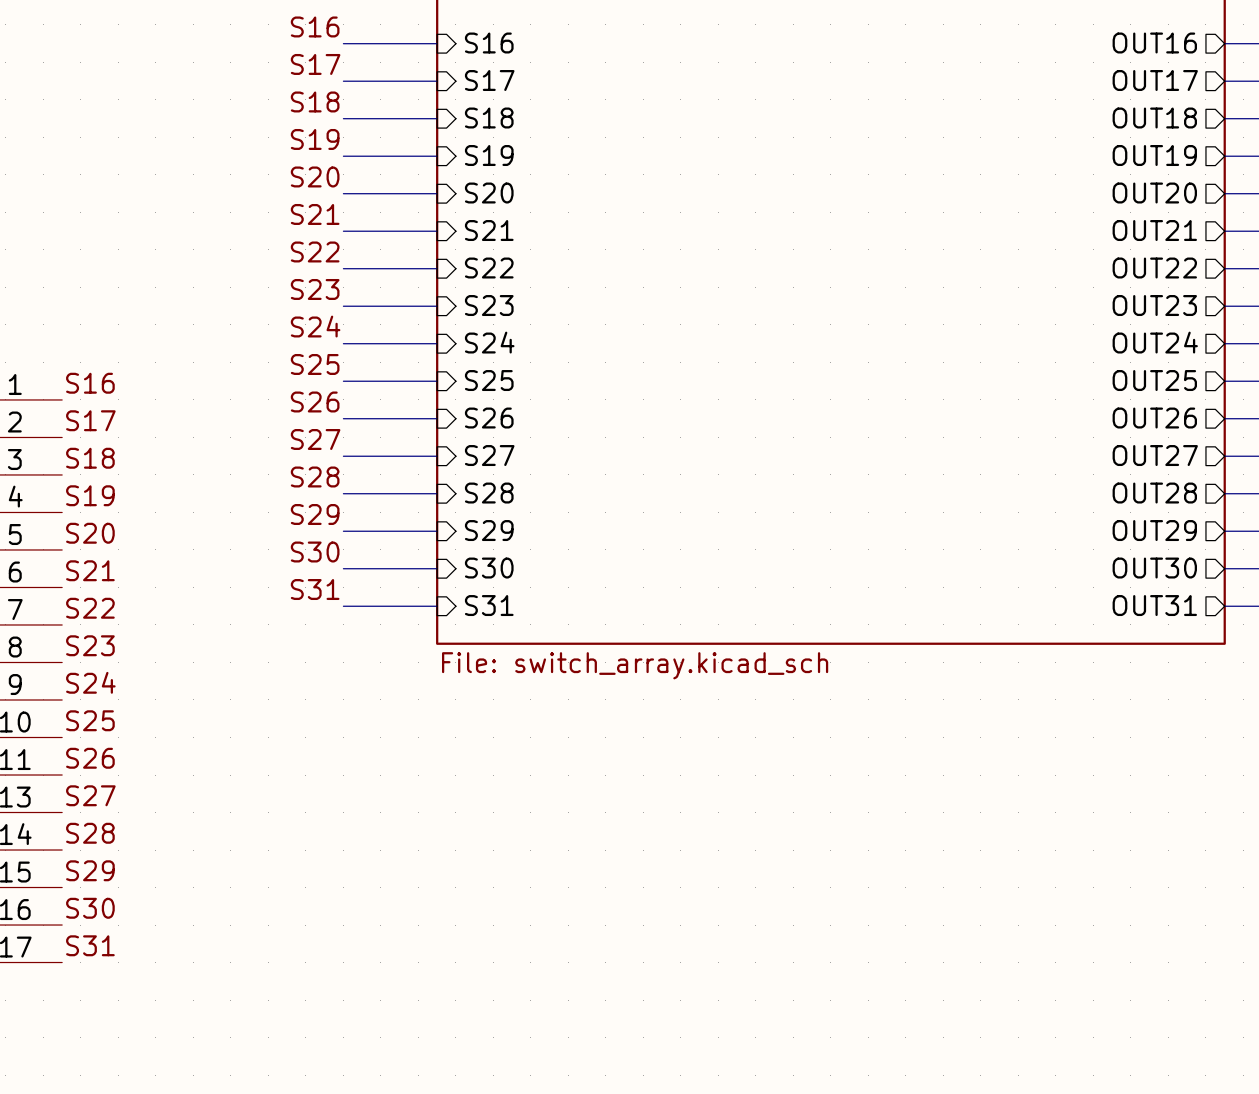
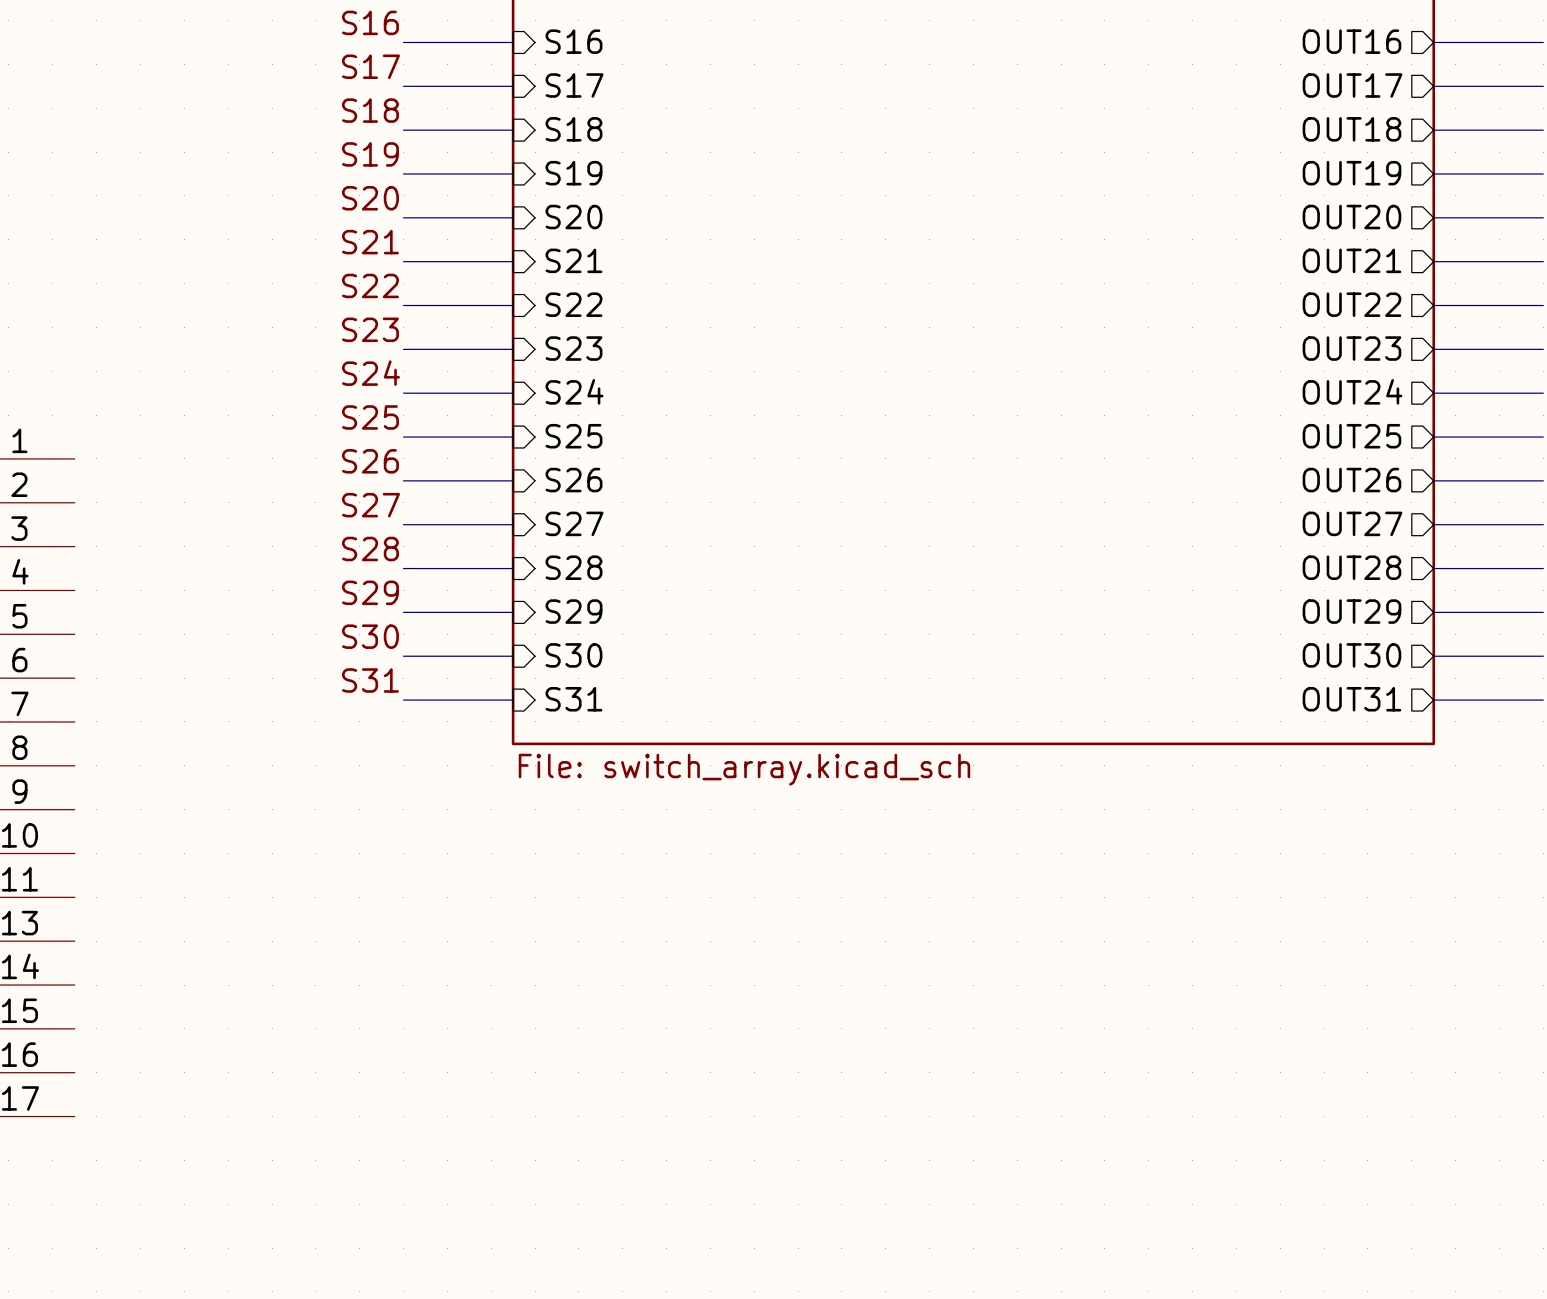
label: S16 (90, 383) -> none
label: S17 (90, 420) -> none
label: S18 (90, 458) -> none
label: S19 (90, 495) -> none
label: S20 (90, 533) -> none
label: S21 (90, 570) -> none
label: S22 (90, 608) -> none
label: S23 (90, 645) -> none
label: S24 (90, 682) -> none
label: S25 (90, 720) -> none
label: S26 (90, 758) -> none
label: S27 (90, 795) -> none
label: S28 (90, 833) -> none
label: S29 (90, 870) -> none
label: S30 (90, 908) -> none
label: S31 (90, 945) -> none

